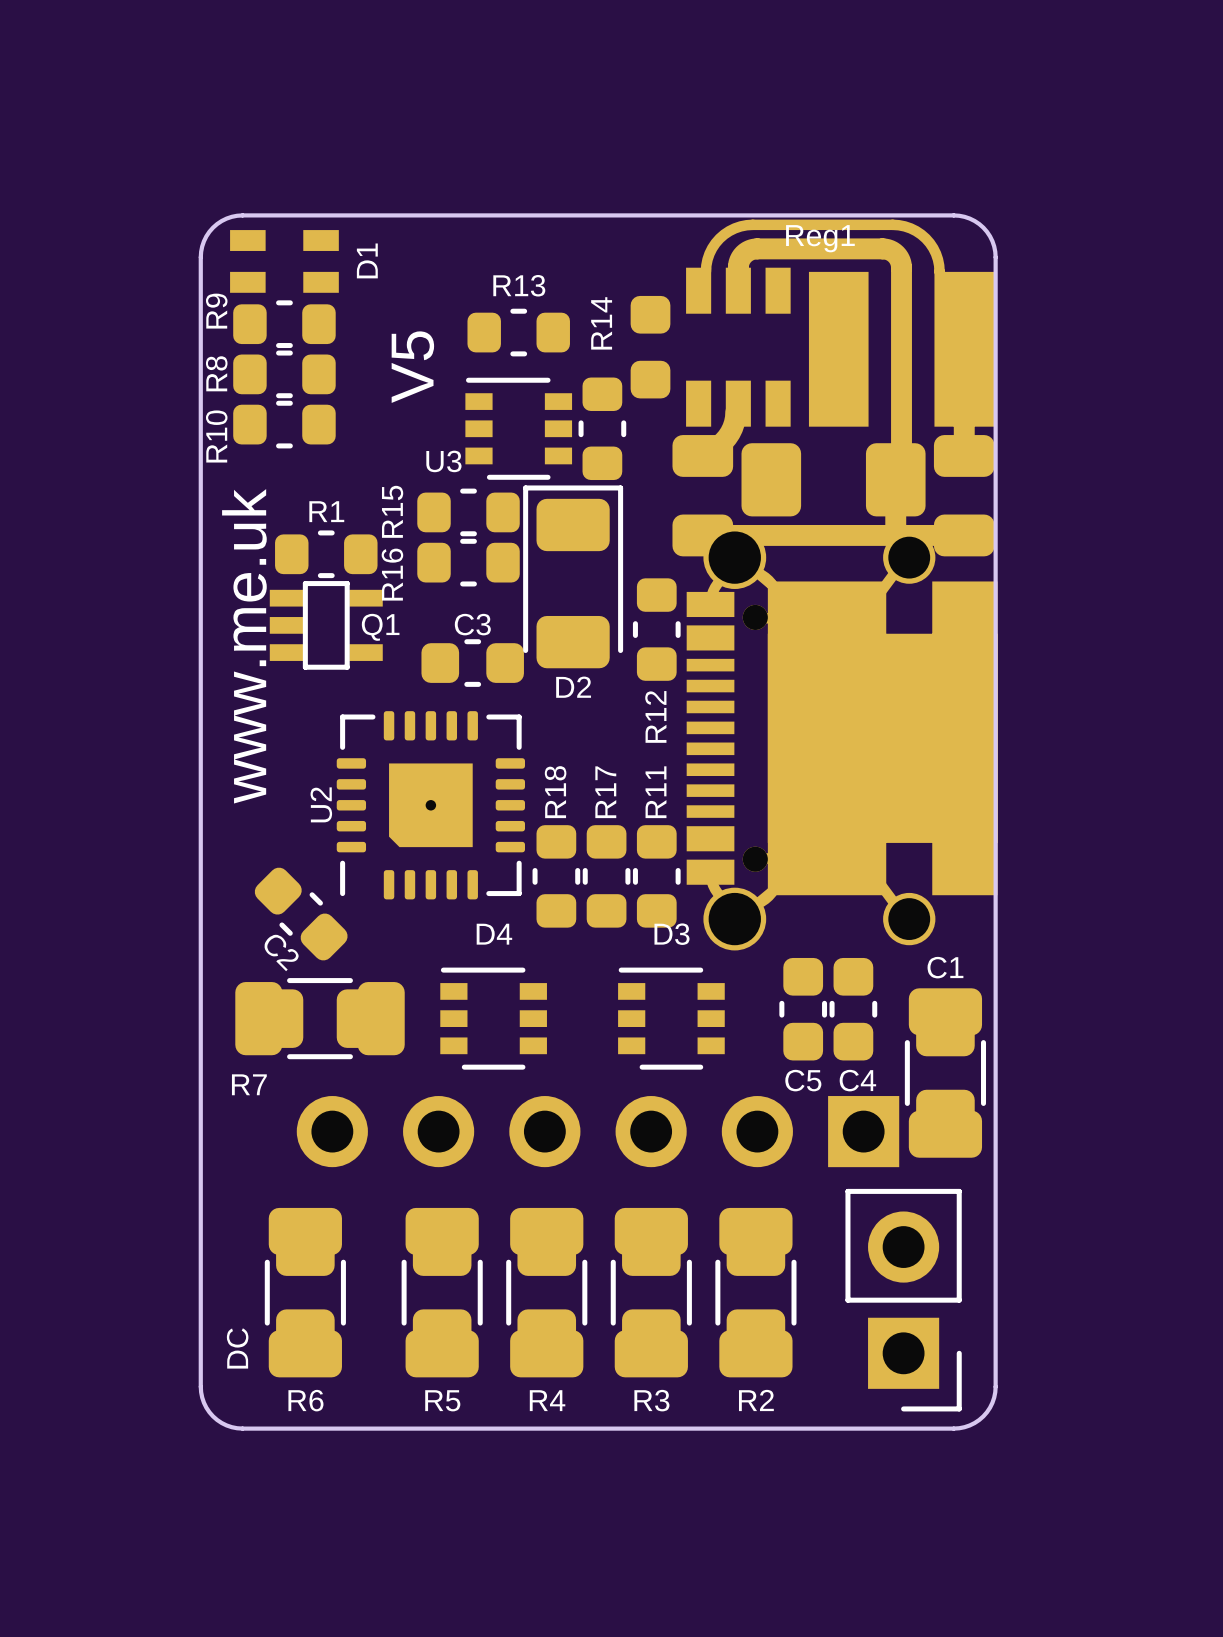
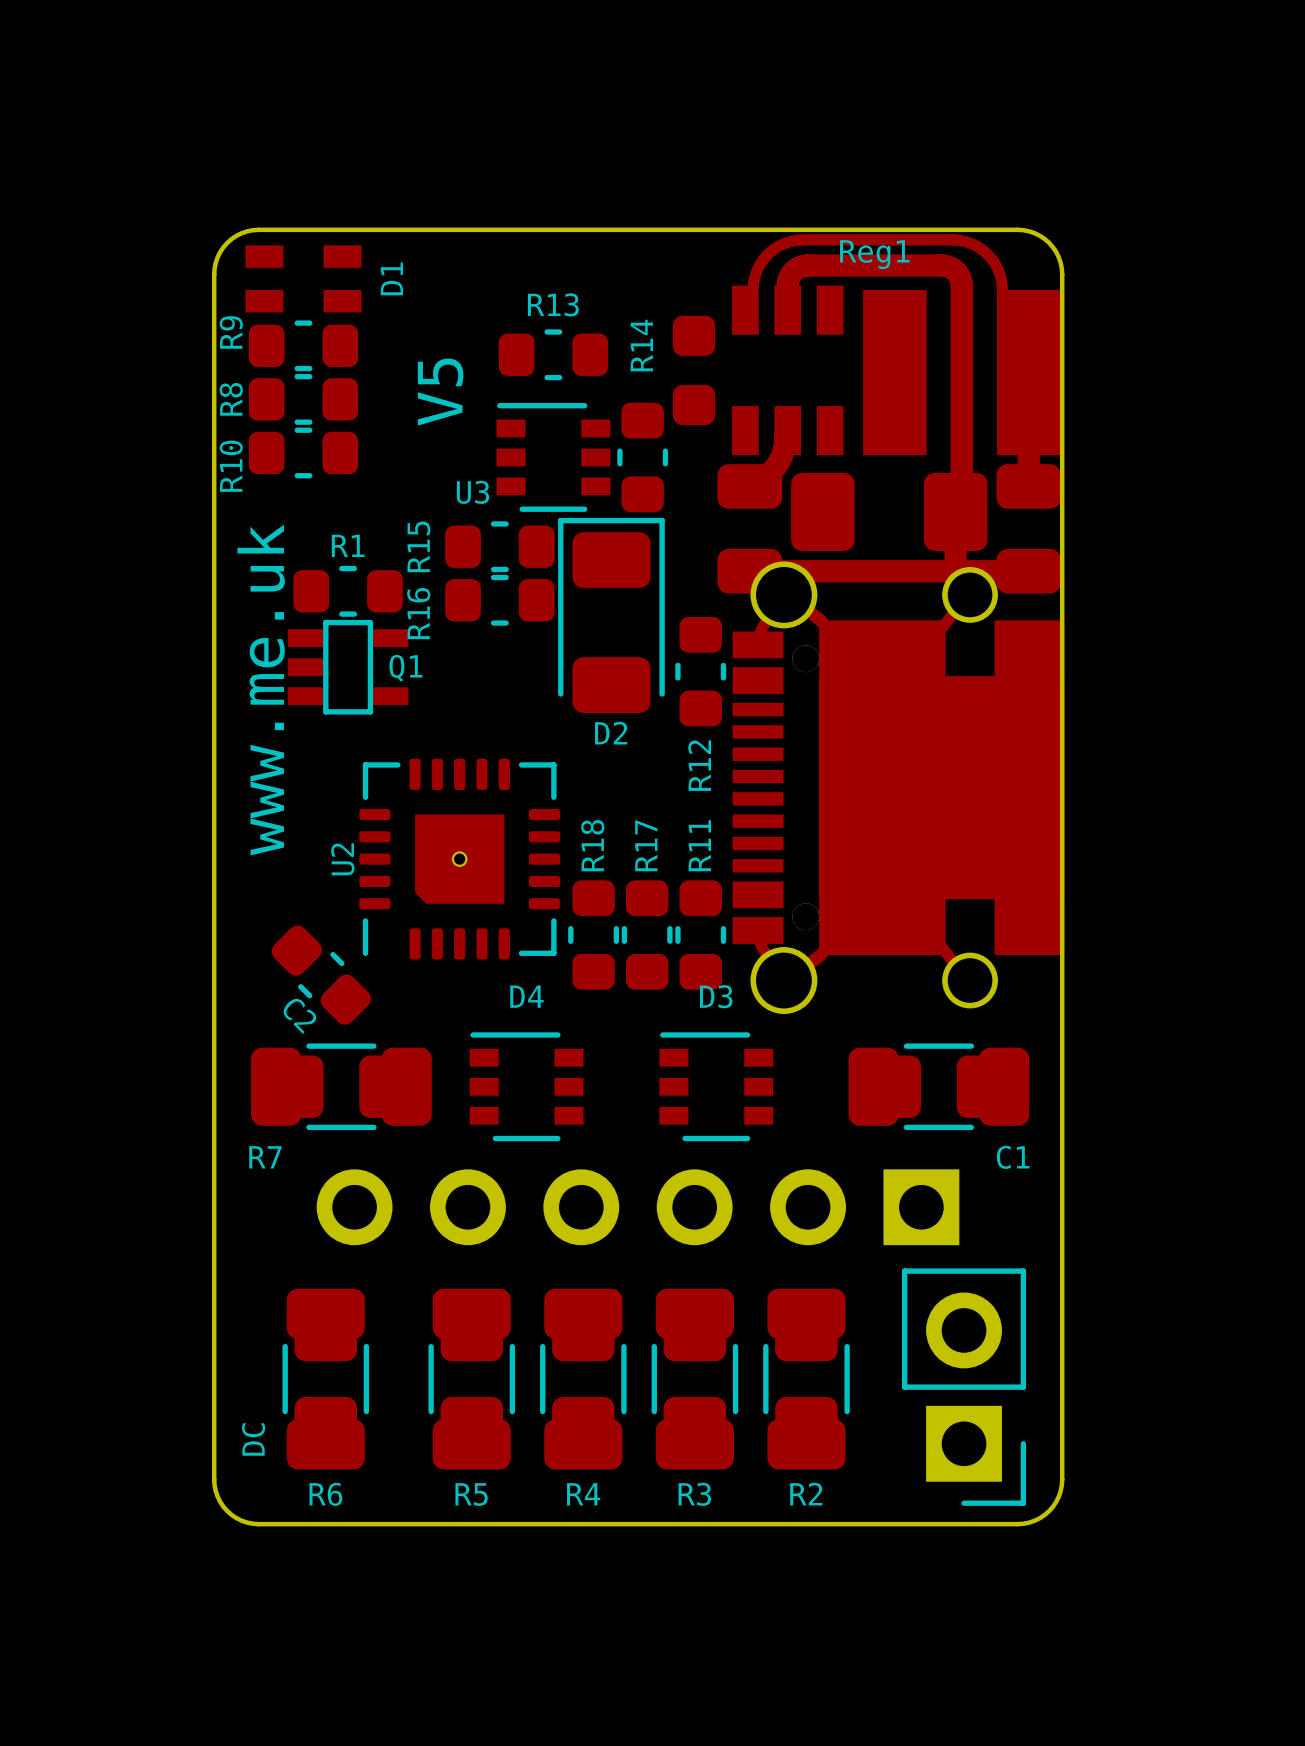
C3: (472, 663) -> none
C5: (803, 1009) -> none
C4: (853, 1009) -> none
C1 rotation: 0° (945, 1073) -> 90° clockwise (938, 1086)

